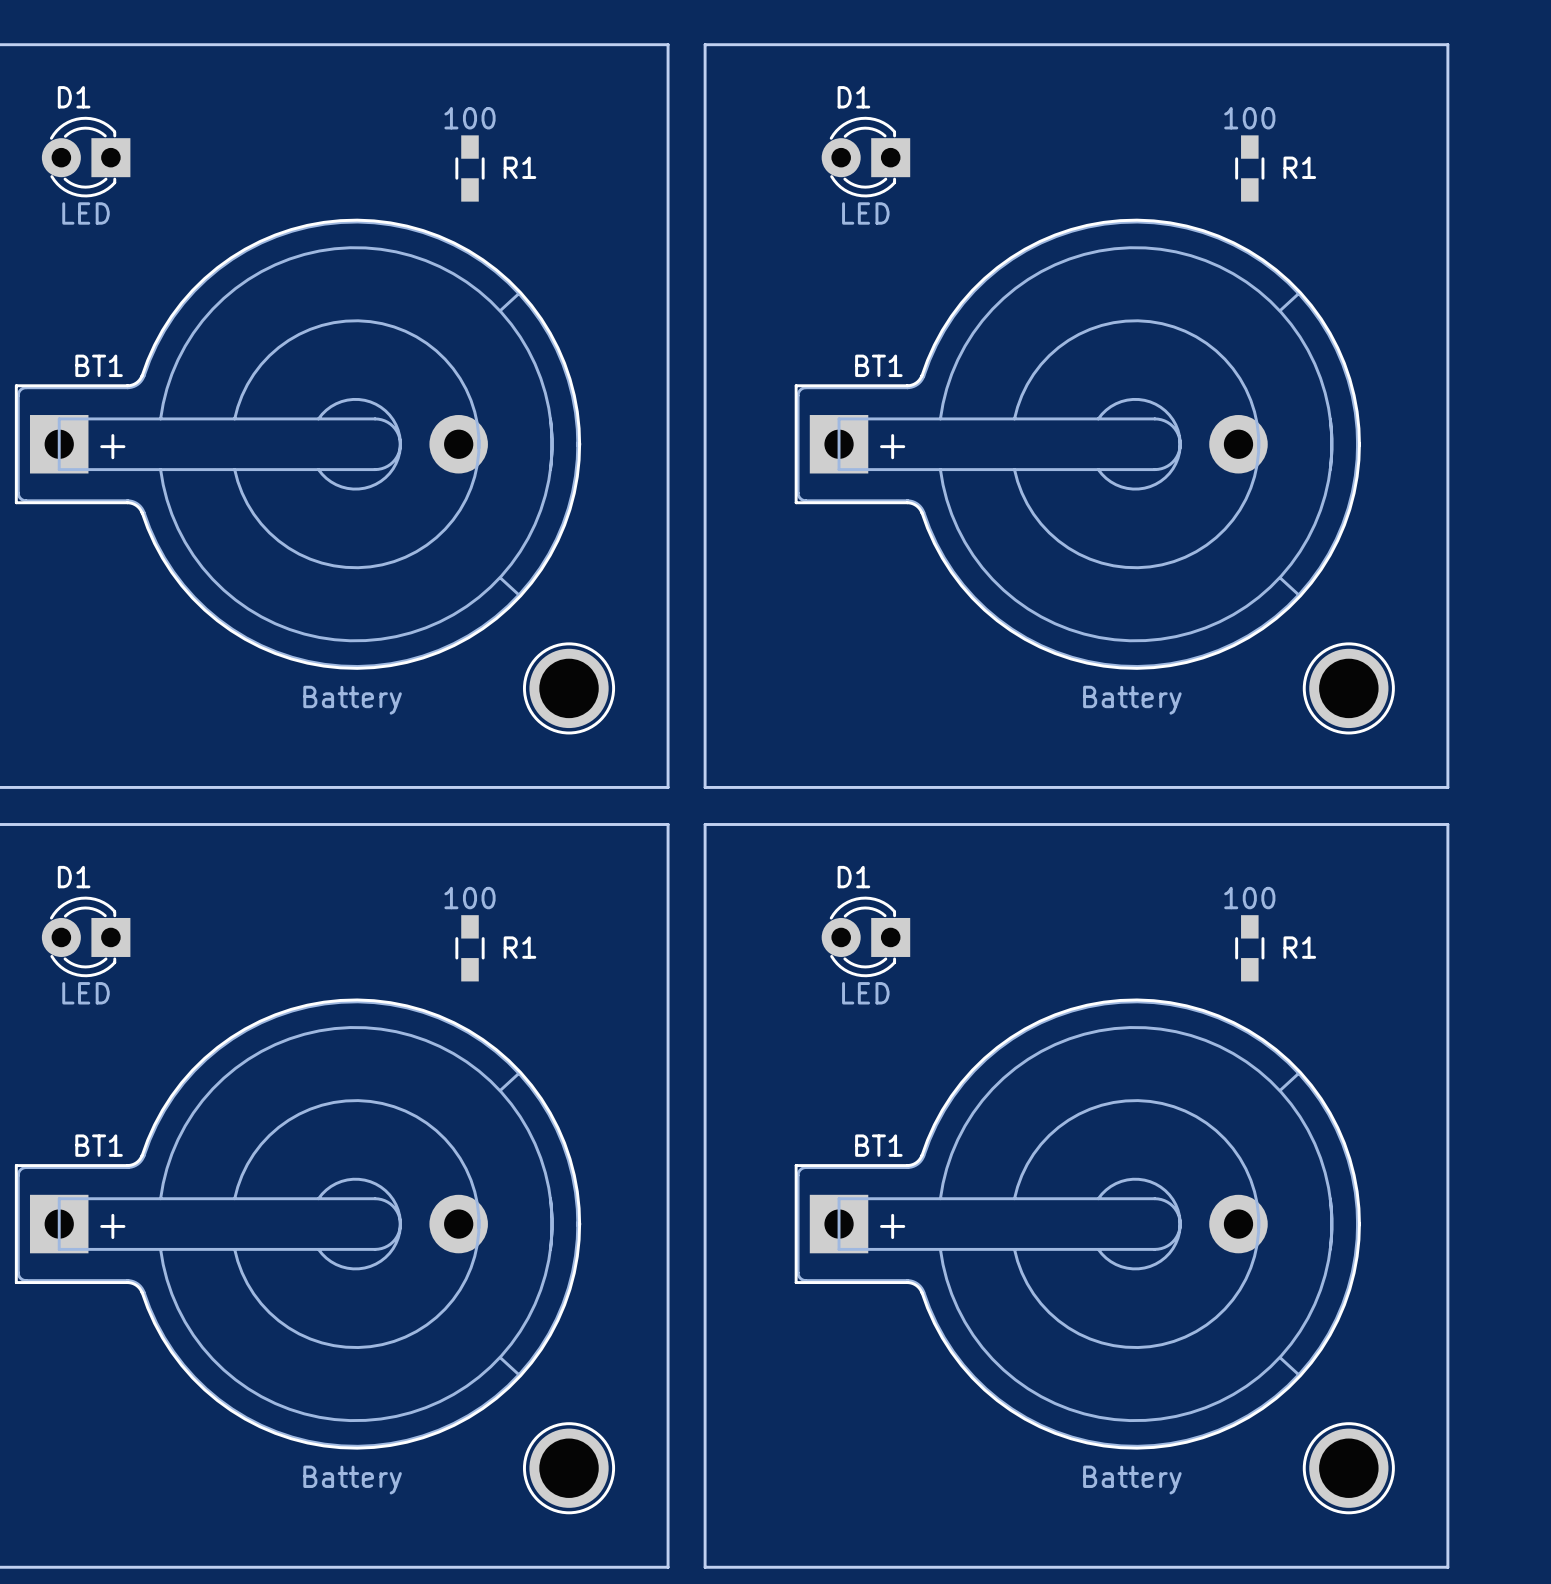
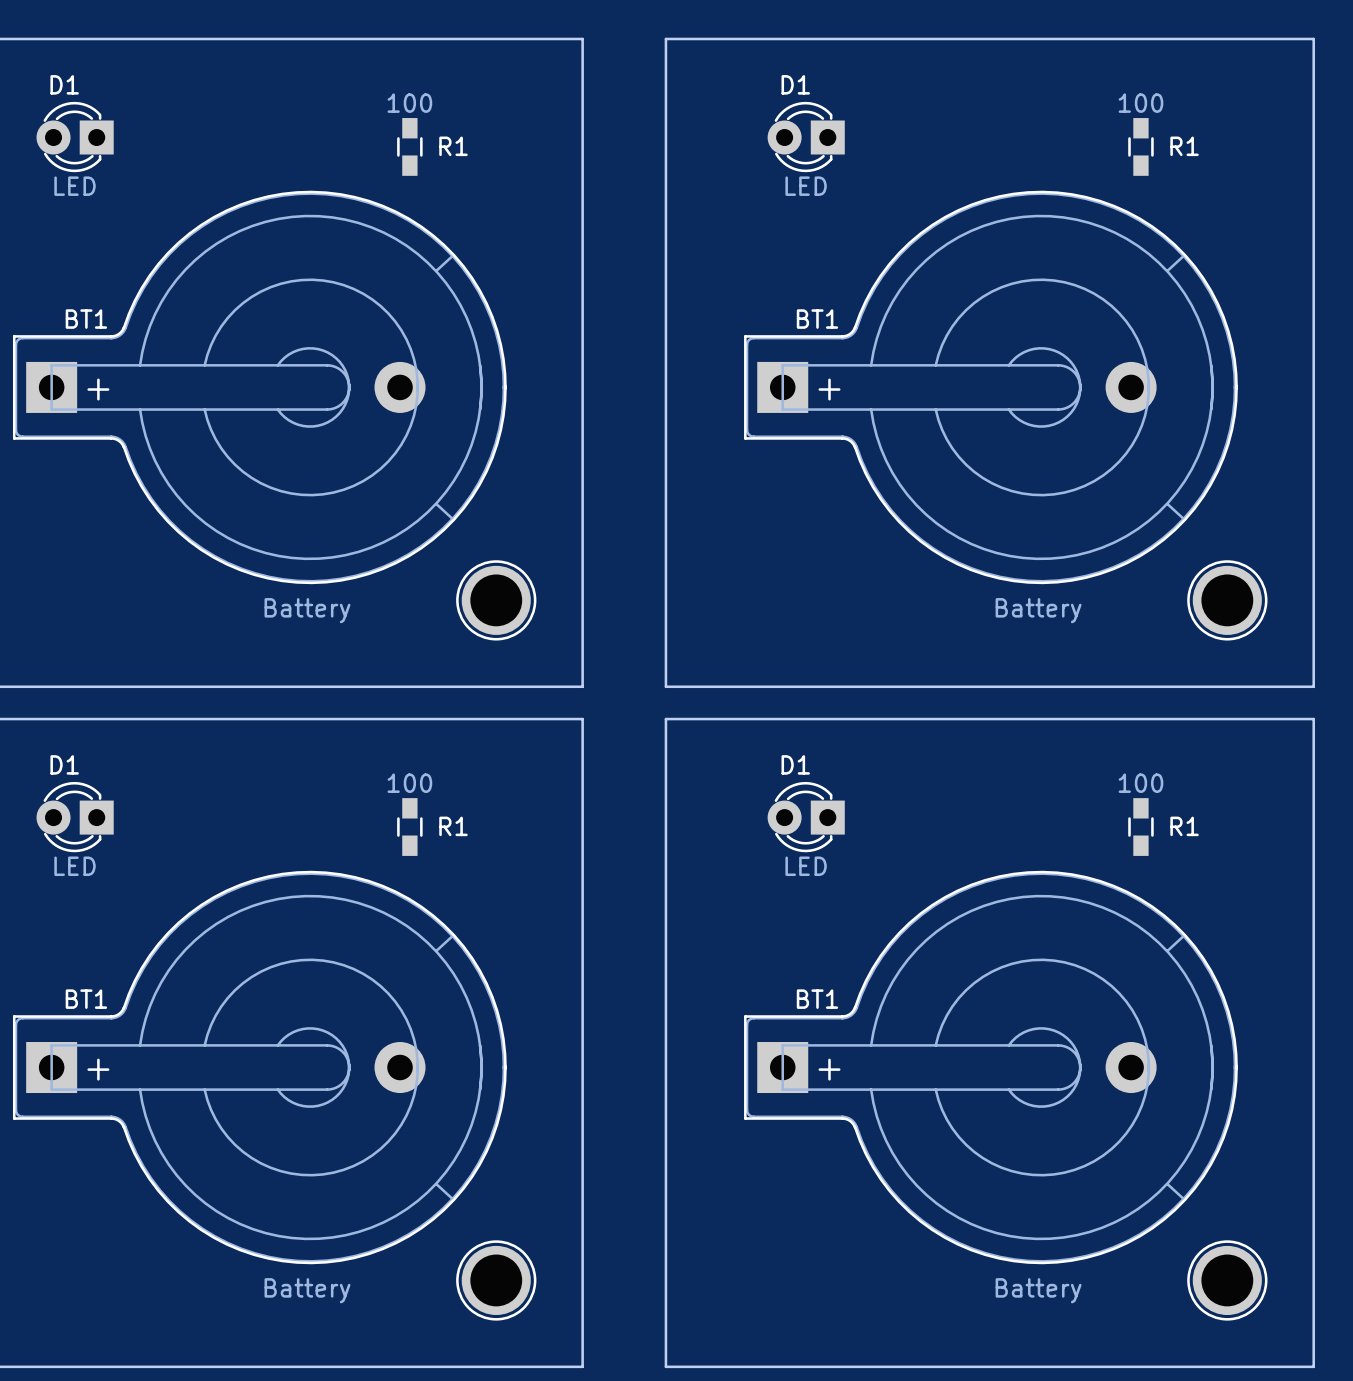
board edge: (763, 44) (705, 44) (705, 787) (763, 787) -> (665, 38) (665, 686)
board edge: (1447, 44) (1447, 787) -> (1262, 38) (1313, 38) (1313, 686) (1262, 686)
D1 position: (865, 157) -> (806, 137)
R1 position: (1249, 168) -> (1140, 146)
BT1 position: (1077, 444) -> (990, 387)
part position: (1348, 688) -> (1227, 600)
board edge: (763, 824) (705, 824) (705, 1567) (763, 1567) -> (665, 719) (665, 1366)
board edge: (1447, 824) (1447, 1567) -> (1262, 719) (1313, 719) (1313, 1366) (1262, 1366)
D1 position: (865, 936) -> (806, 817)
R1 position: (1249, 948) -> (1140, 827)
BT1 position: (1077, 1224) -> (990, 1067)
part position: (1348, 1468) -> (1227, 1280)

